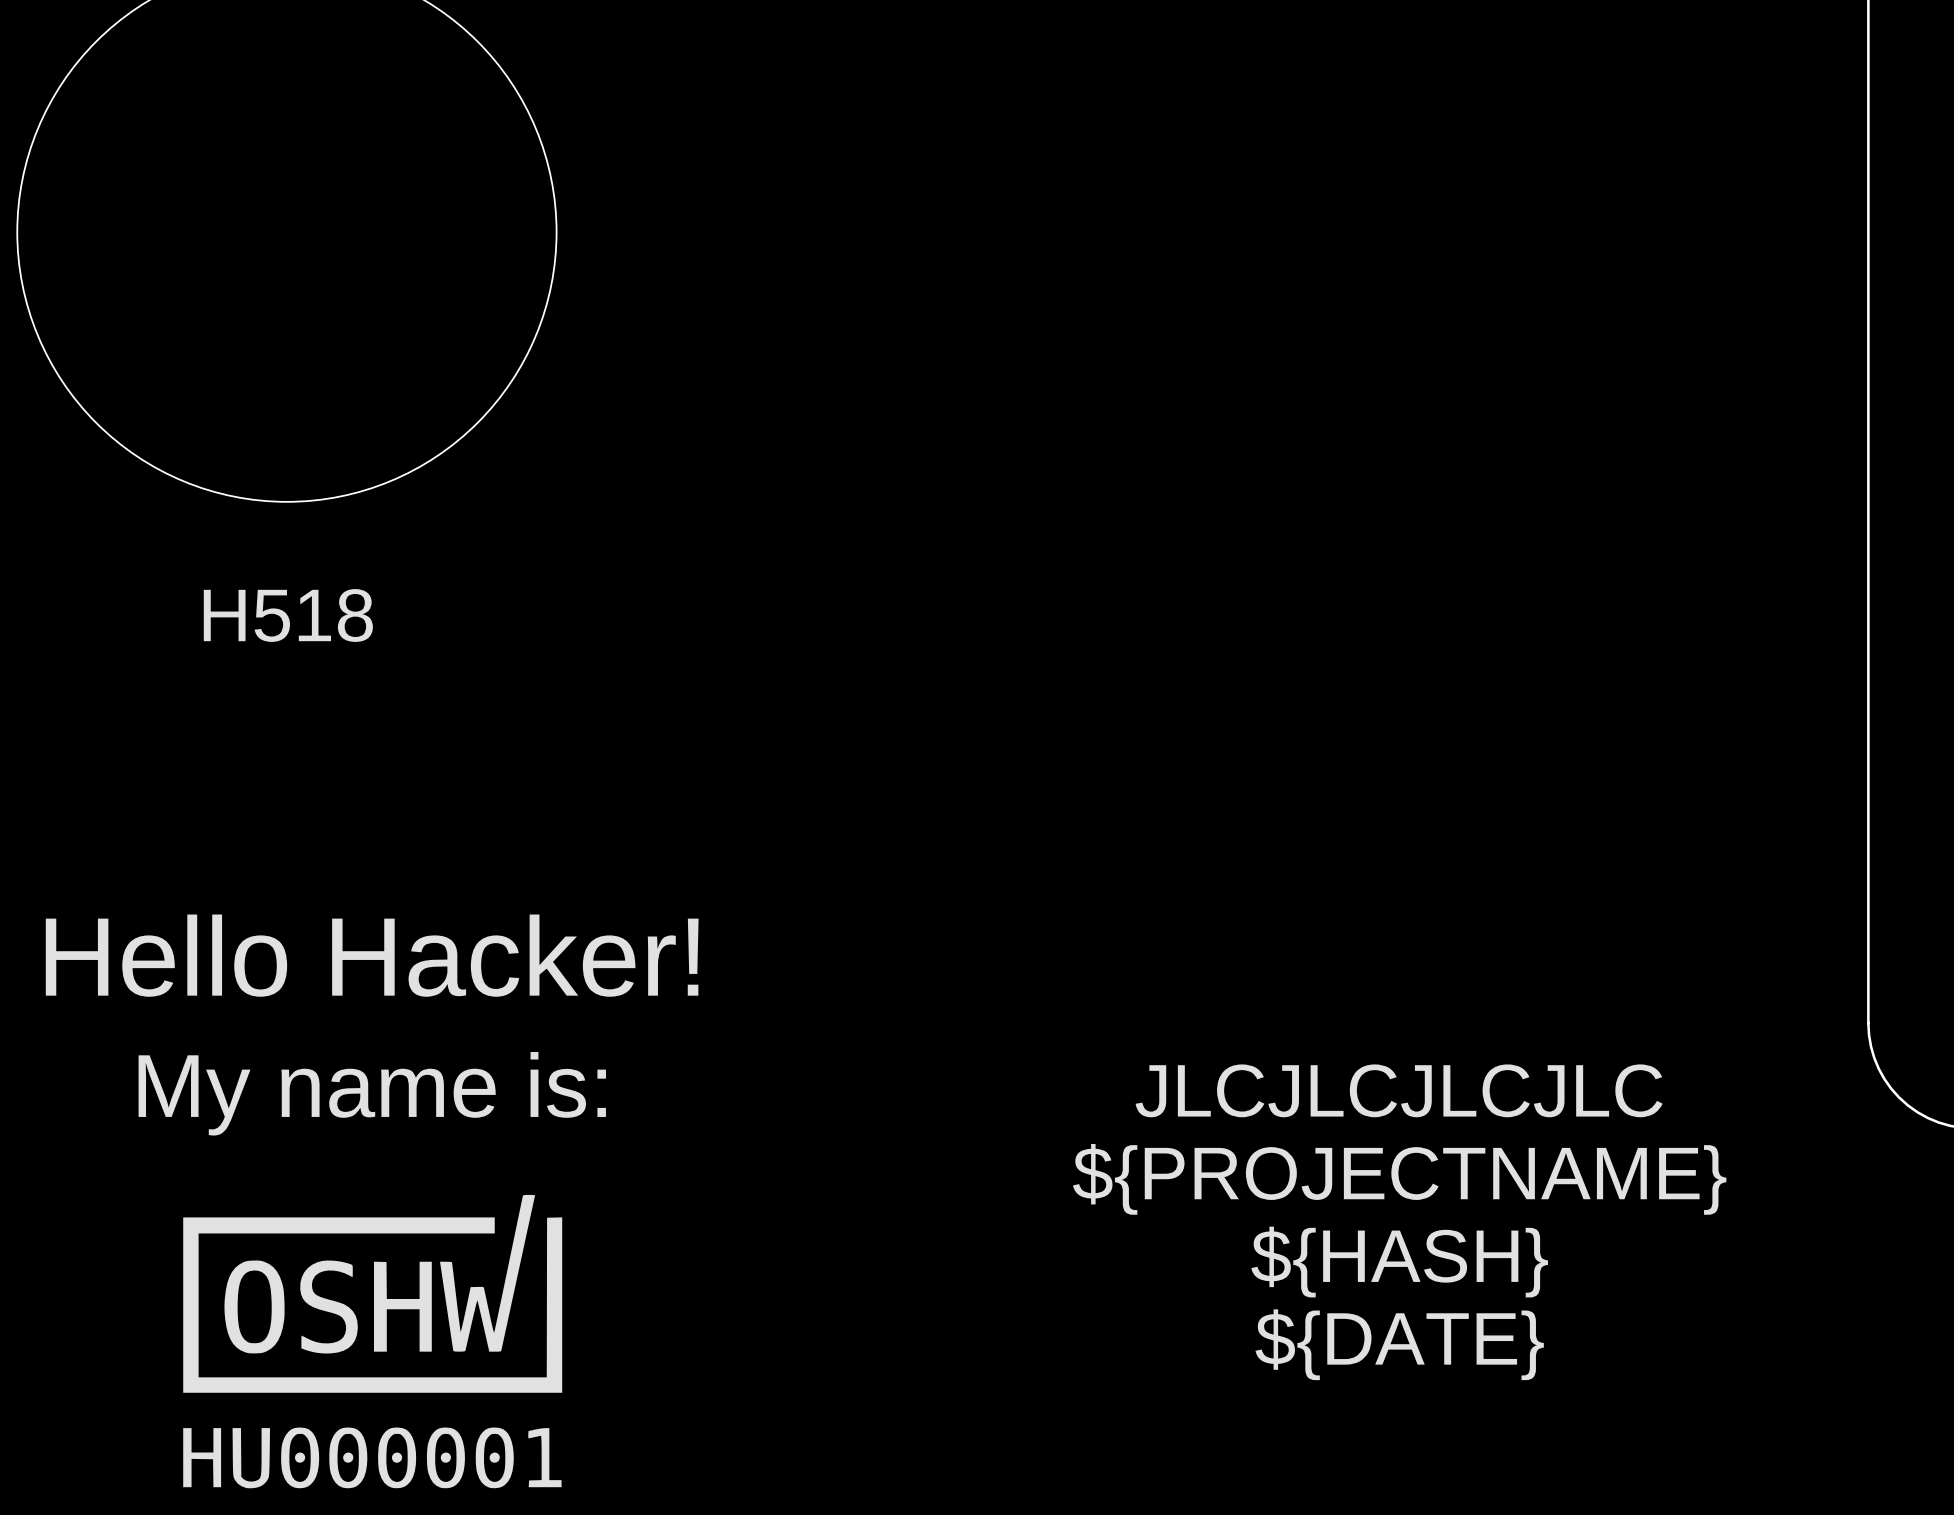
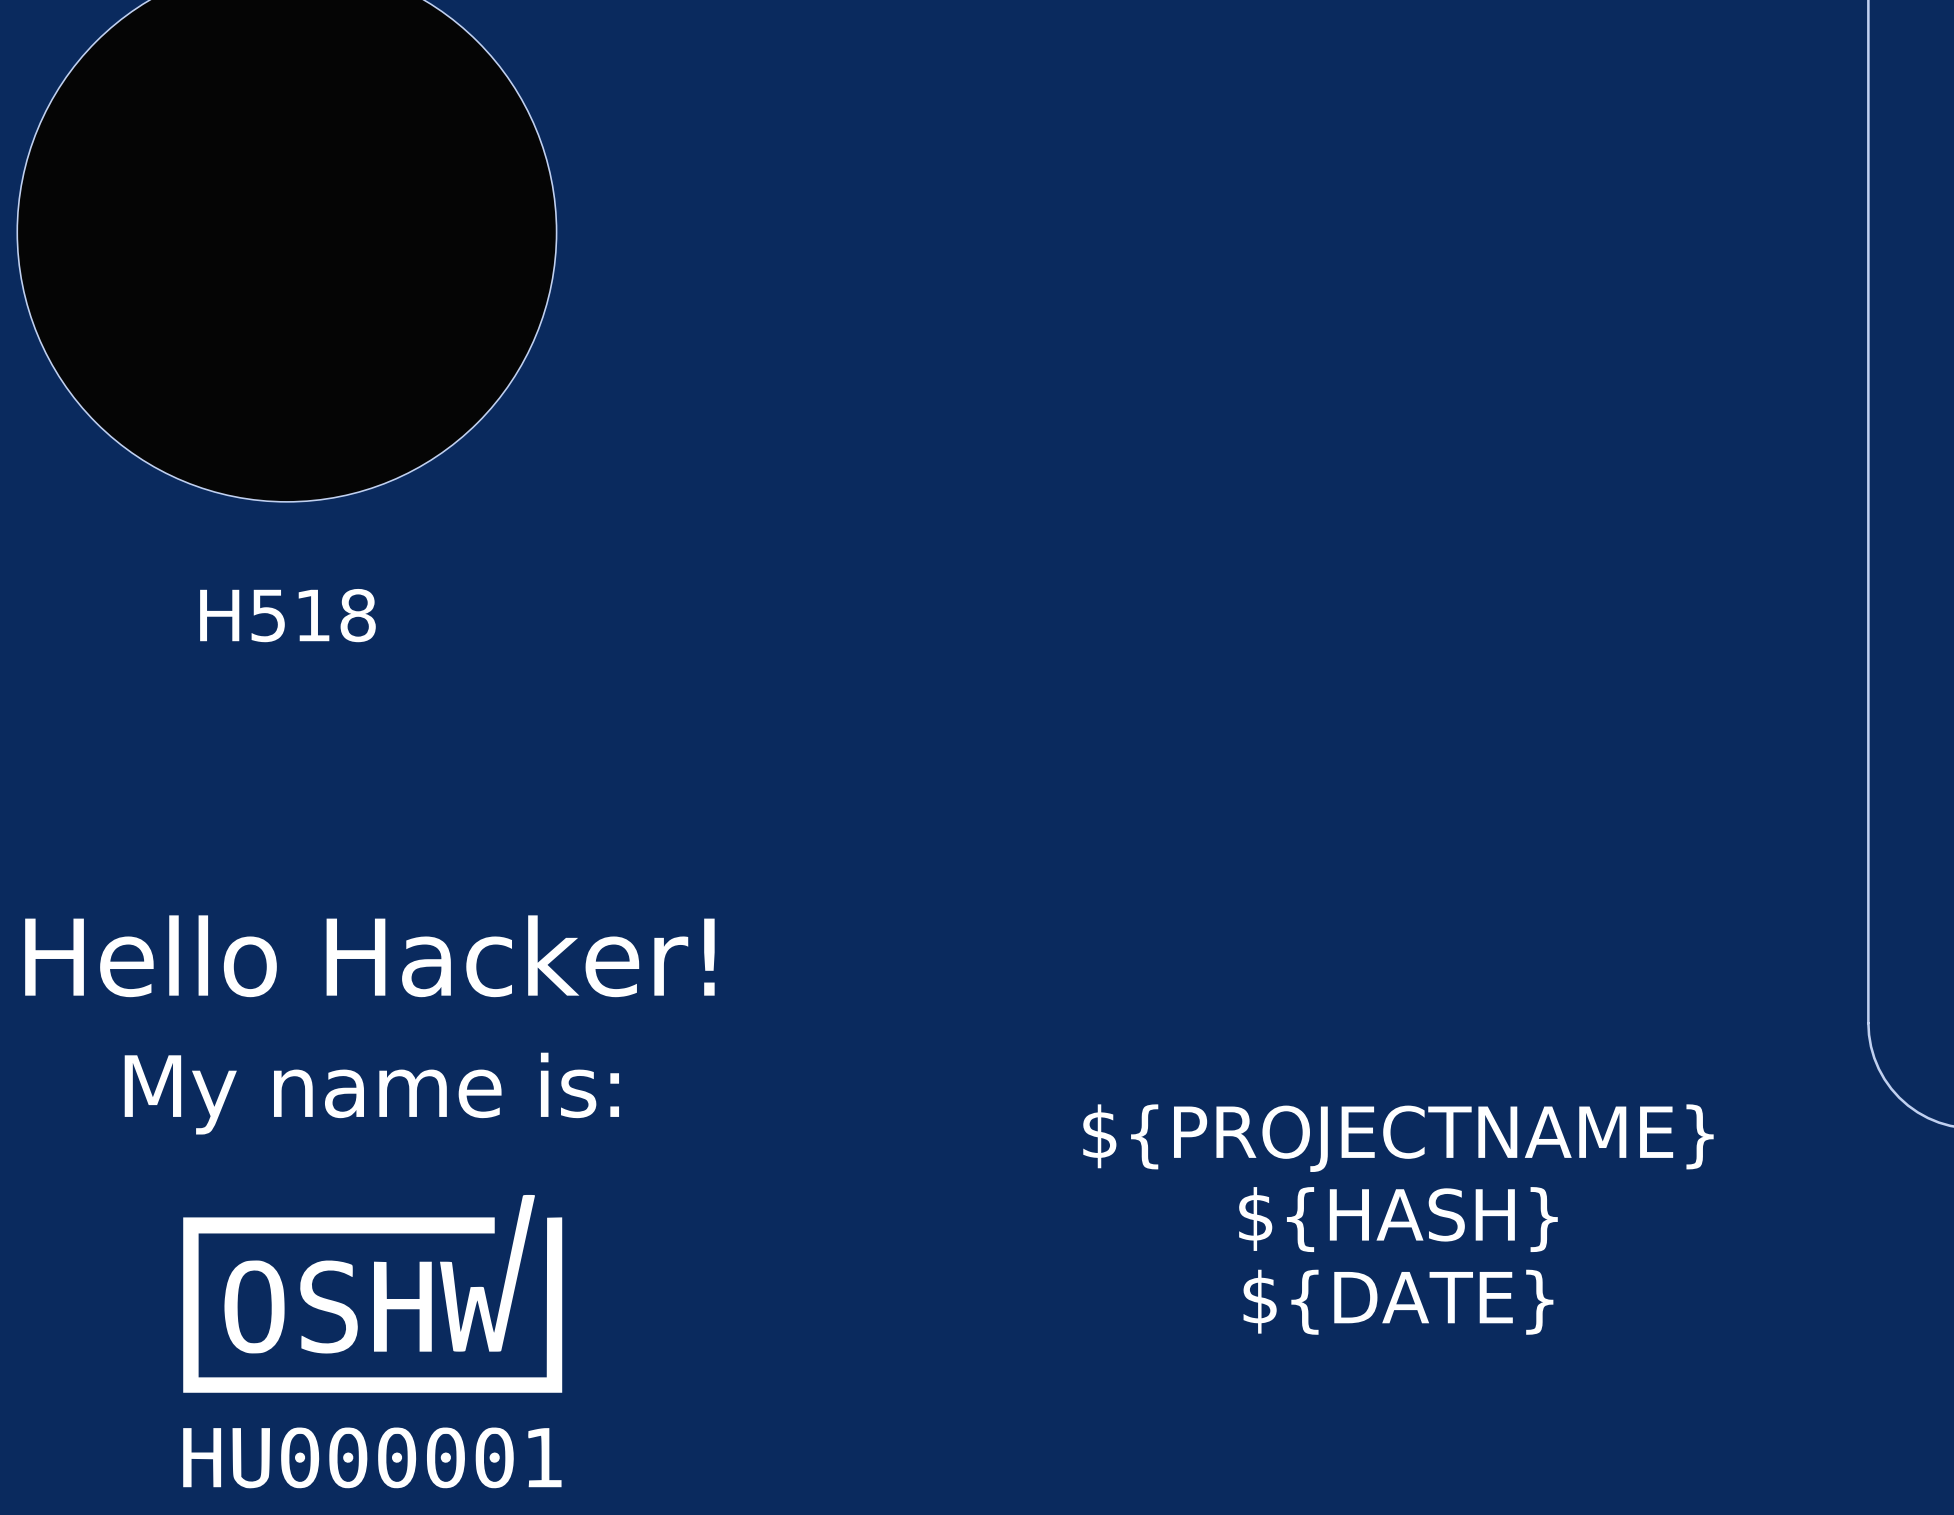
text: JLCJLCJLCJLC (1399, 1090) -> none
text position: ${PROJECTNAME} (1399, 1179) -> ${PROJECTNAME} (1398, 1138)
text position: ${HASH} (1399, 1262) -> ${HASH} (1398, 1219)
text position: ${DATE} (1399, 1344) -> ${DATE} (1398, 1302)

